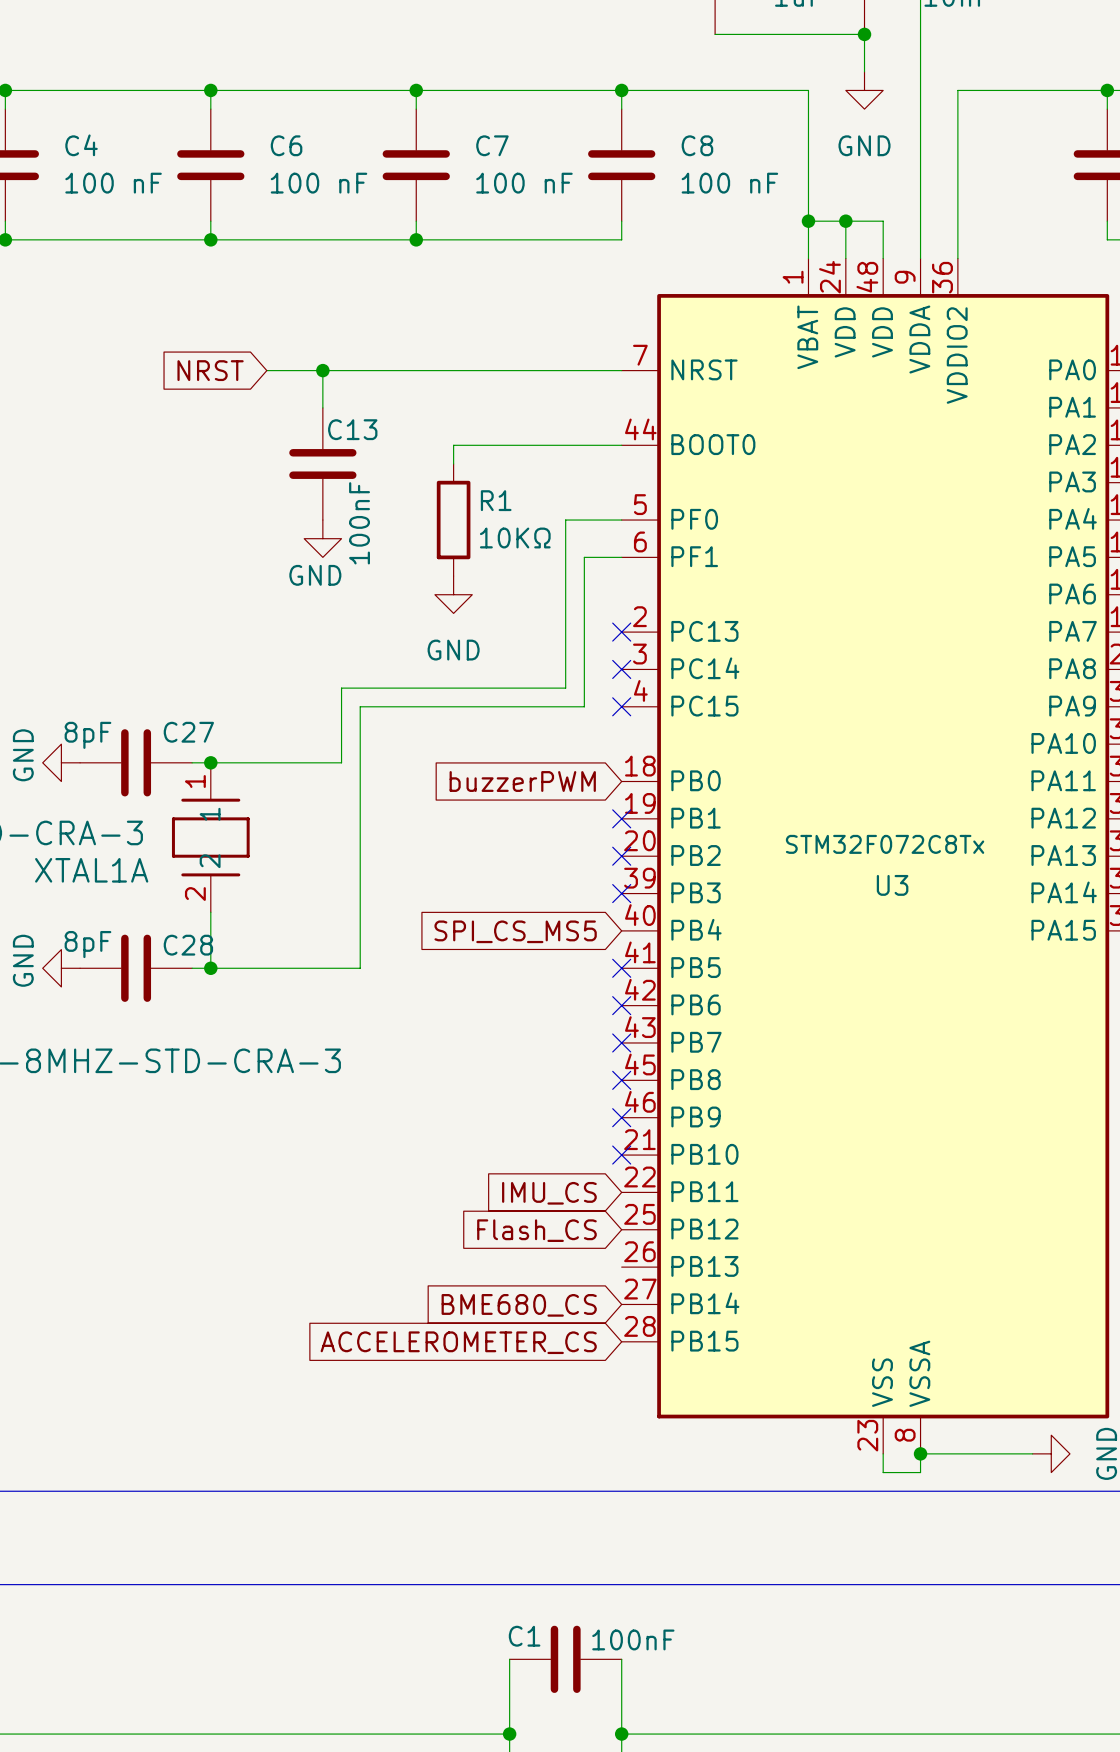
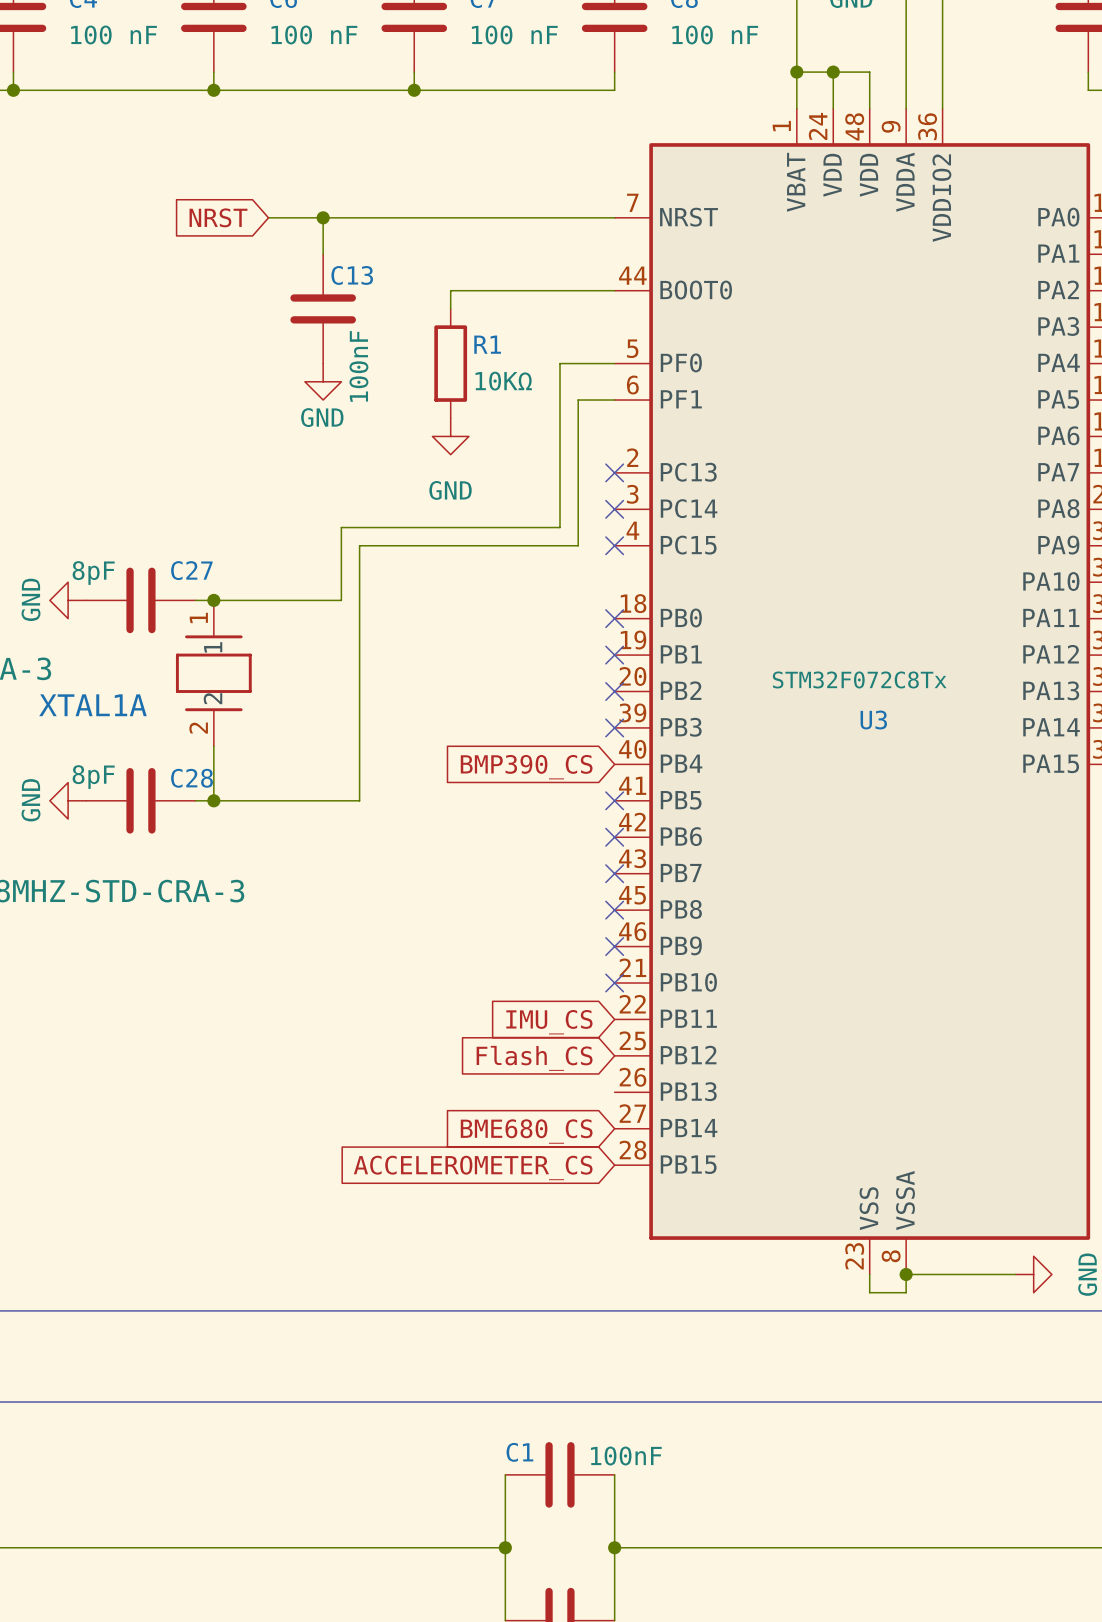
global label: buzzerPWM (522, 781) -> none
no-connect mark: none -> (614, 618)
global label: SPI_CS_MS5 (515, 931) -> BMP390_CS (526, 767)

